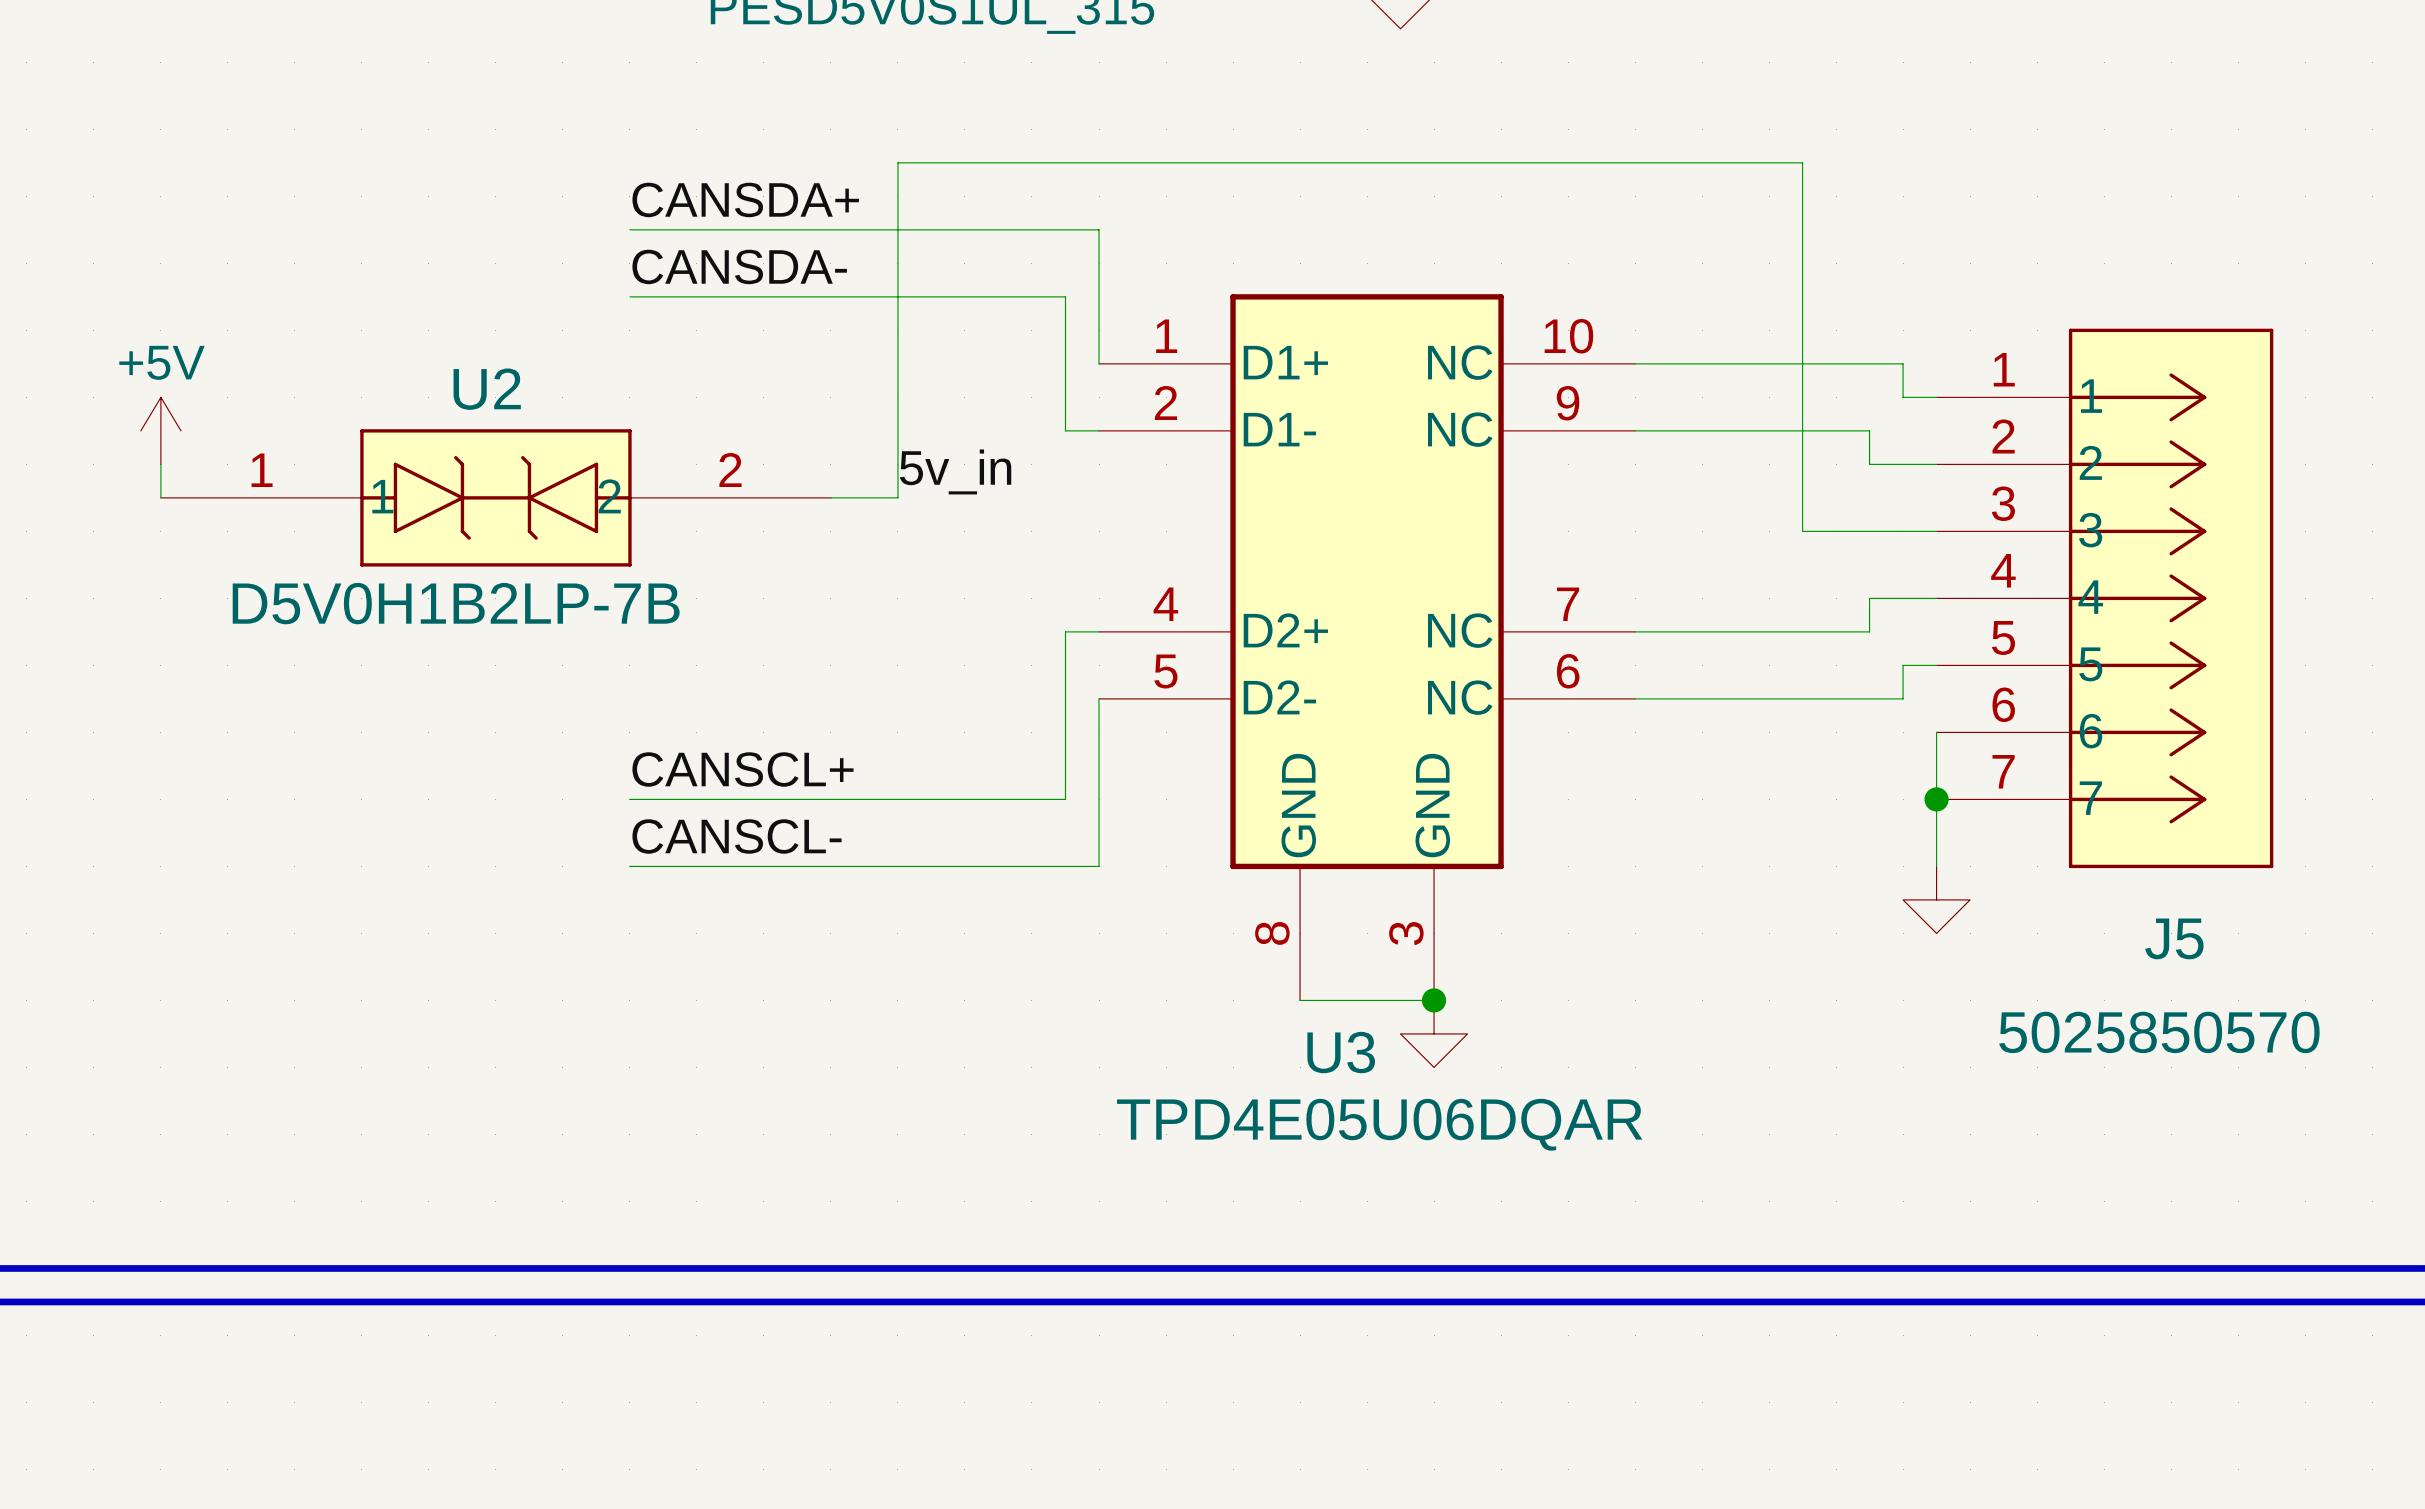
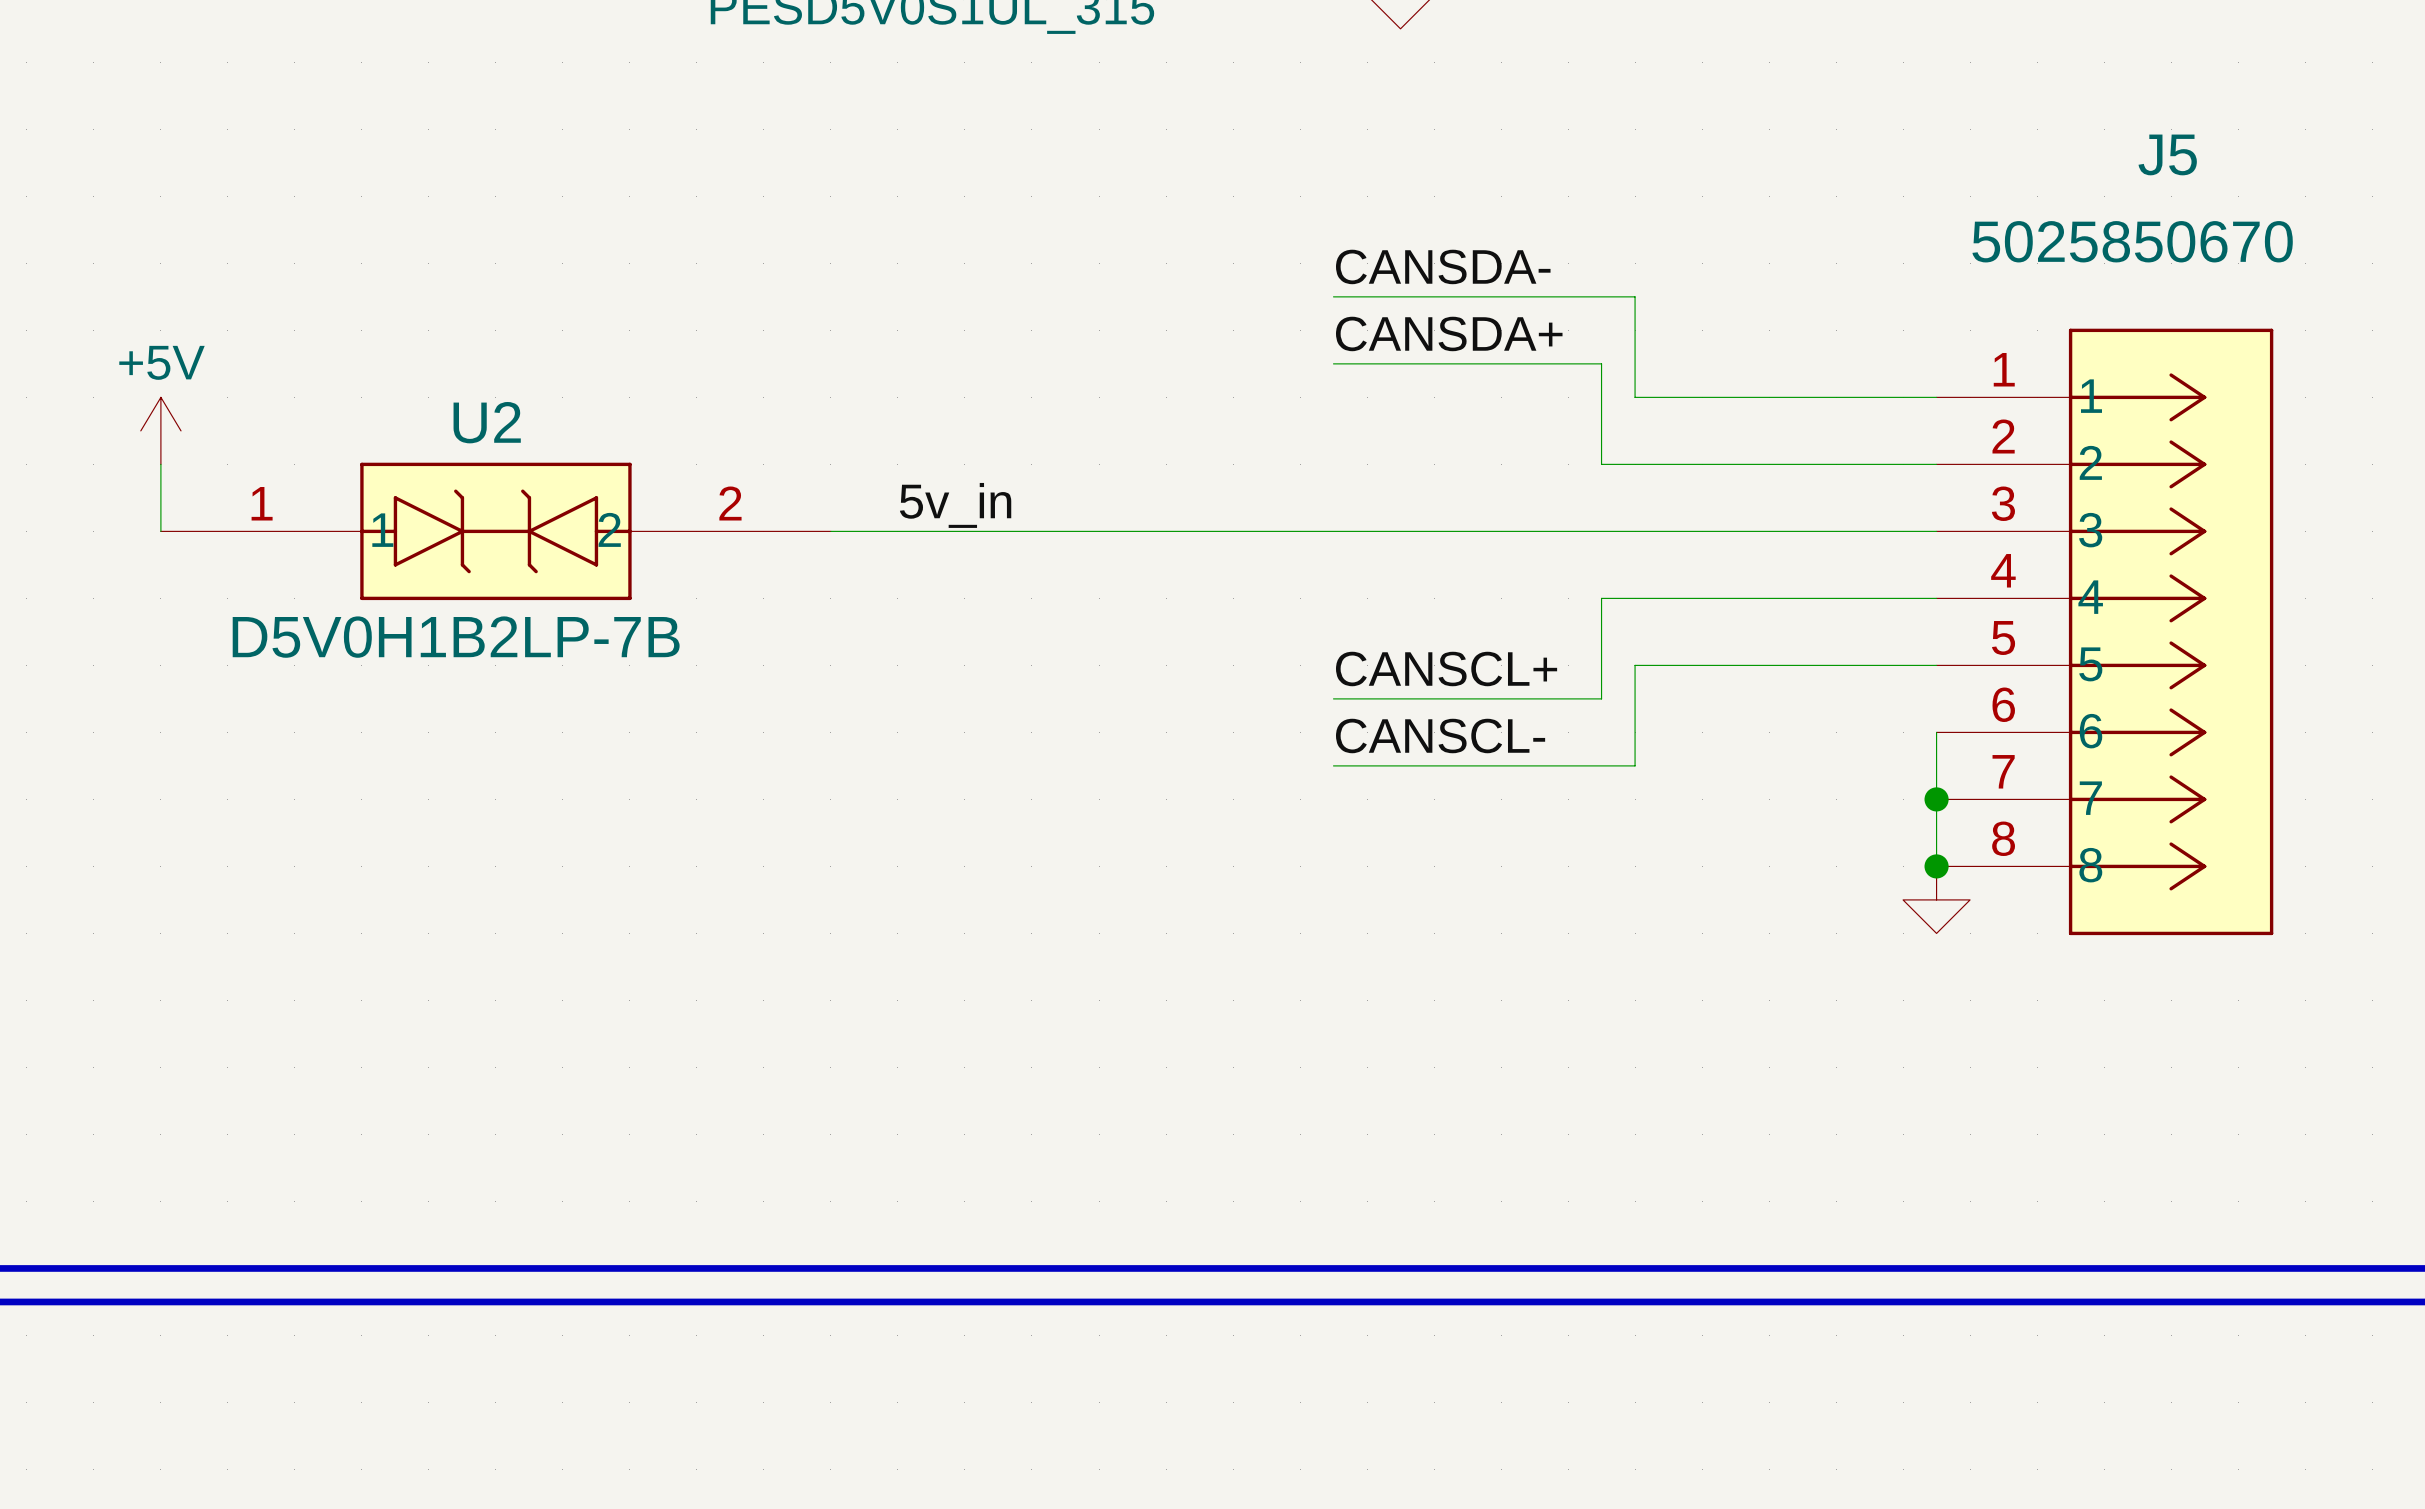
label: CANSDA+ (745, 199) -> none
wire: (629, 229) (1099, 229) (1099, 363) -> none
label: CANSDA- (739, 266) -> none
label: none -> CANSDA- (1443, 266)
wire: (629, 296) (1065, 296) (1065, 430) (1099, 430) -> none
J5 symbol: [1936, 328, 2274, 869] -> [1936, 328, 2274, 936]
label: none -> CANSDA+ (1449, 333)
wire: (1635, 363) (1903, 363) (1903, 397) -> (1333, 296) (1635, 296) (1635, 397) (1903, 397)
wire: (1635, 430) (1869, 430) (1869, 464) -> (1333, 363) (1601, 363) (1601, 464) (1869, 464)
label position: 5v_in (955, 471) -> 5v_in (955, 505)
wire: none -> (160, 497) (160, 531)
U2 position: (495, 497) -> (495, 531)
wire: (830, 497) (897, 497) (897, 162) (1802, 162) (1802, 531) -> (830, 531) (1802, 531)
wire: (1869, 598) (1869, 631) (1635, 631) -> (1869, 598) (1601, 598) (1601, 698) (1333, 698)
wire: (1099, 631) (1065, 631) (1065, 799) (629, 799) -> none
U3: TPD4E05U06DQAR (1367, 647) -> none
wire: (1903, 665) (1903, 698) (1635, 698) -> (1903, 665) (1635, 665) (1635, 765) (1333, 765)
label: none -> CANSCL+ (1446, 669)
wire: (1099, 698) (1099, 866) (629, 866) -> none
label: none -> CANSCL- (1440, 736)
label: CANSCL+ (742, 769) -> none
label: CANSCL- (736, 836) -> none
junction: none -> (1936, 866)
J5 name position: J5 (2174, 938) -> J5 (2167, 154)
wire: (1300, 1000) (1434, 1000) -> none
junction: (1434, 1000) -> none
J5 value: 5025850570 (2159, 1032) -> 5025850670 (2132, 241)
power symbol: (1434, 1033) -> none

